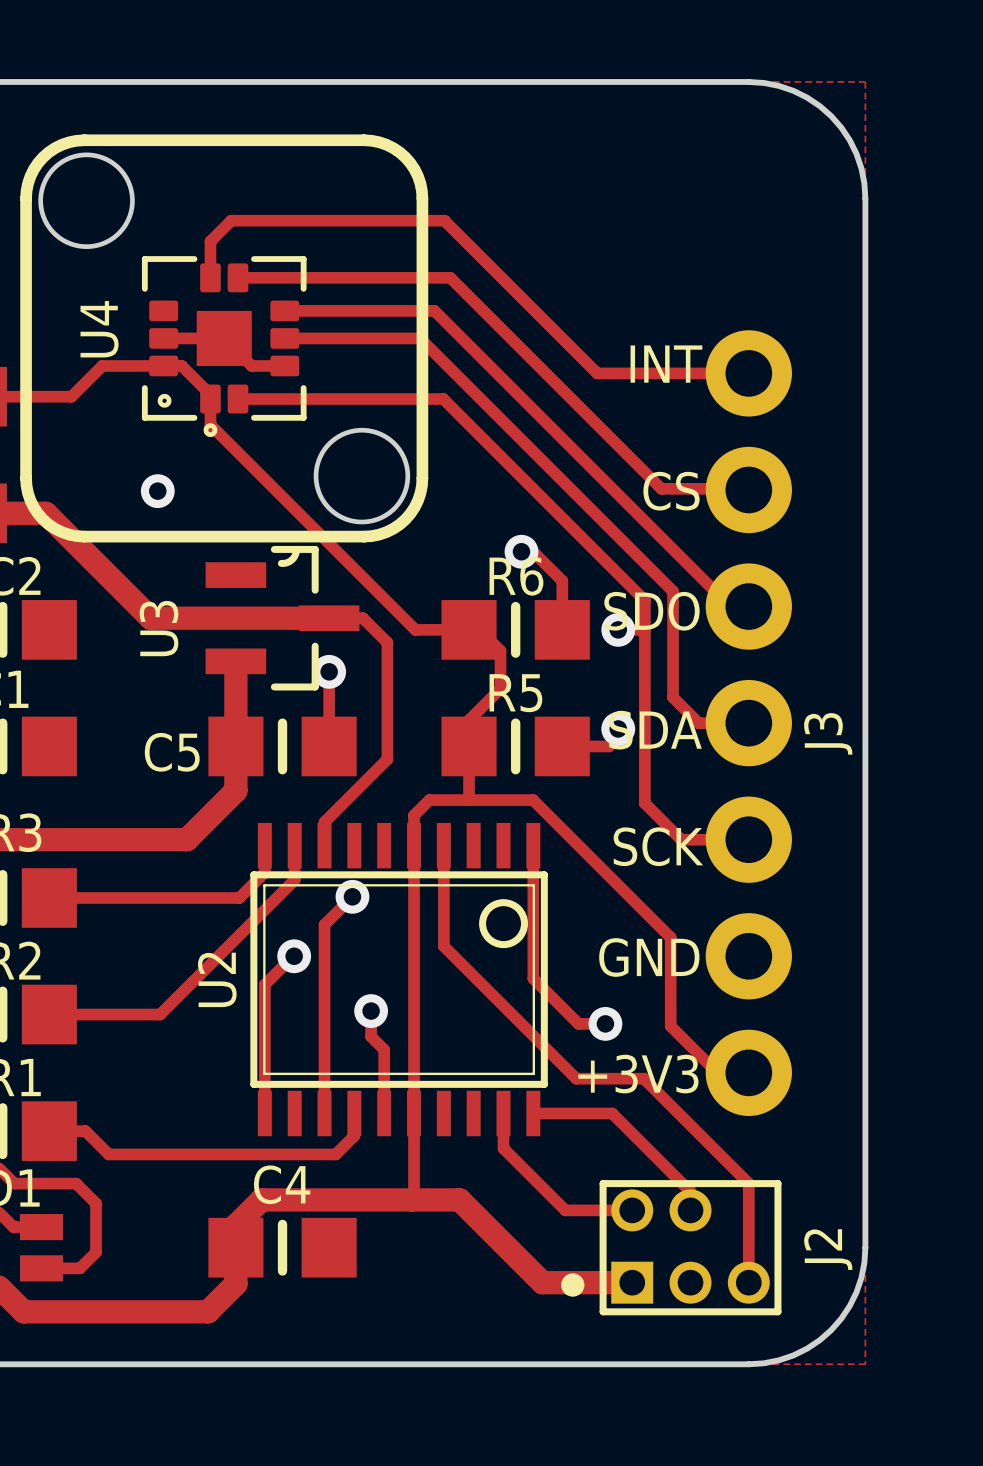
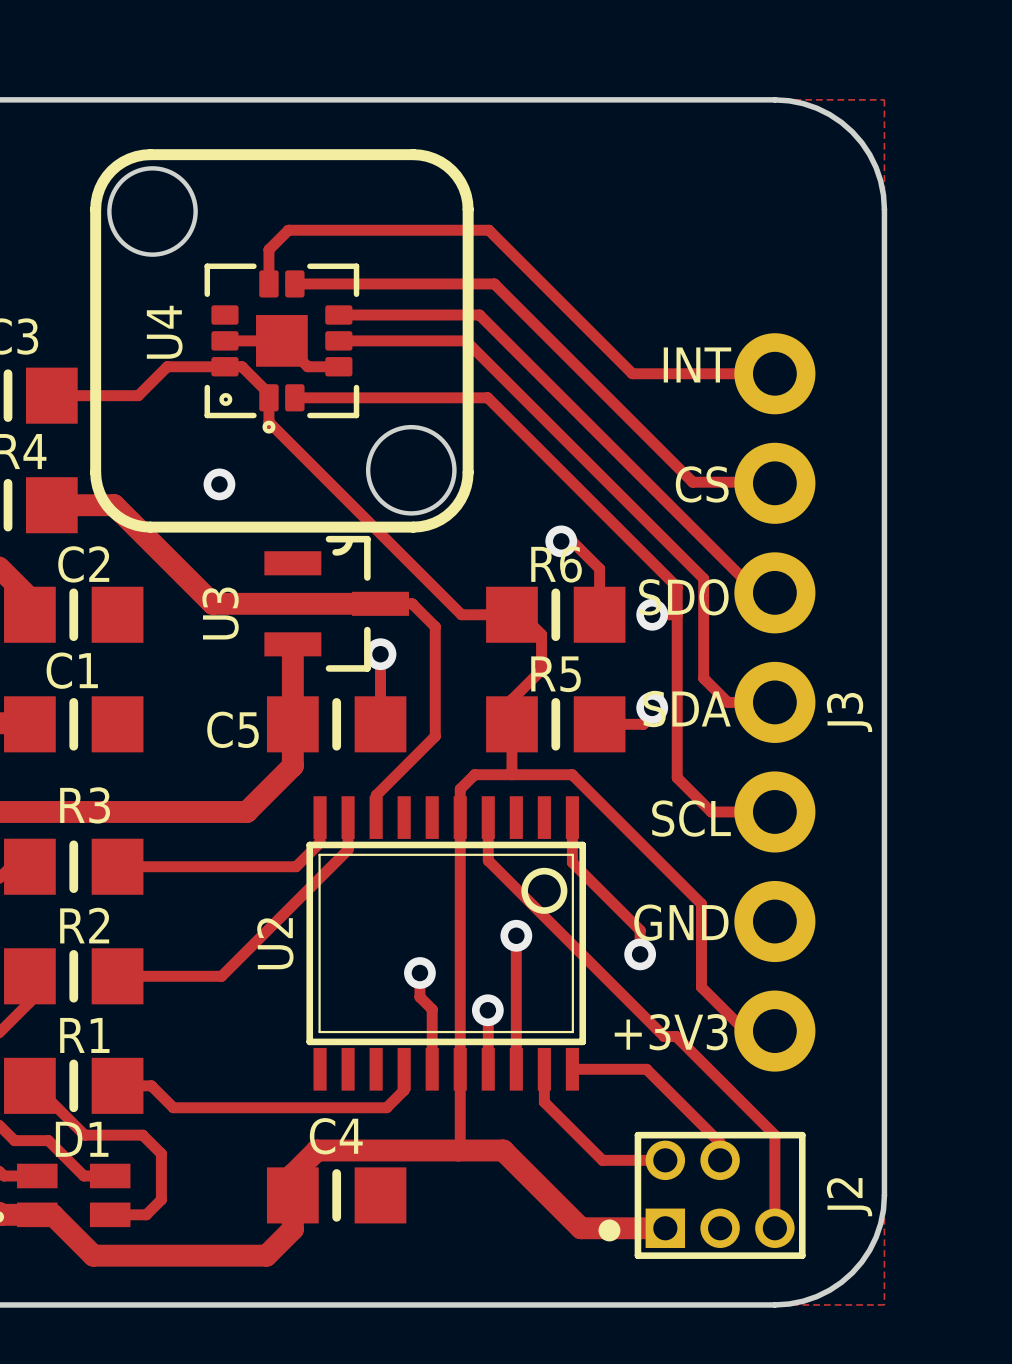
text: SCK (658, 846) -> SCL (691, 818)
track: (443, 891) (443, 946) (576, 1078) (631, 1078) -> (488, 860) (664, 1036)
track: (533, 893) (533, 978) (578, 1023) (605, 1023) -> (572, 862) (640, 930) (640, 954)
track: (352, 896) (324, 924) (324, 1113) -> none
via: (352, 896) -> none
track: (294, 956) (264, 984) (264, 1113) -> none
via: (294, 956) -> none
track: none -> (516, 935) (516, 1069)
via: none -> (516, 935)
via position: (605, 1023) -> (640, 954)
via: none -> (487, 1010)

